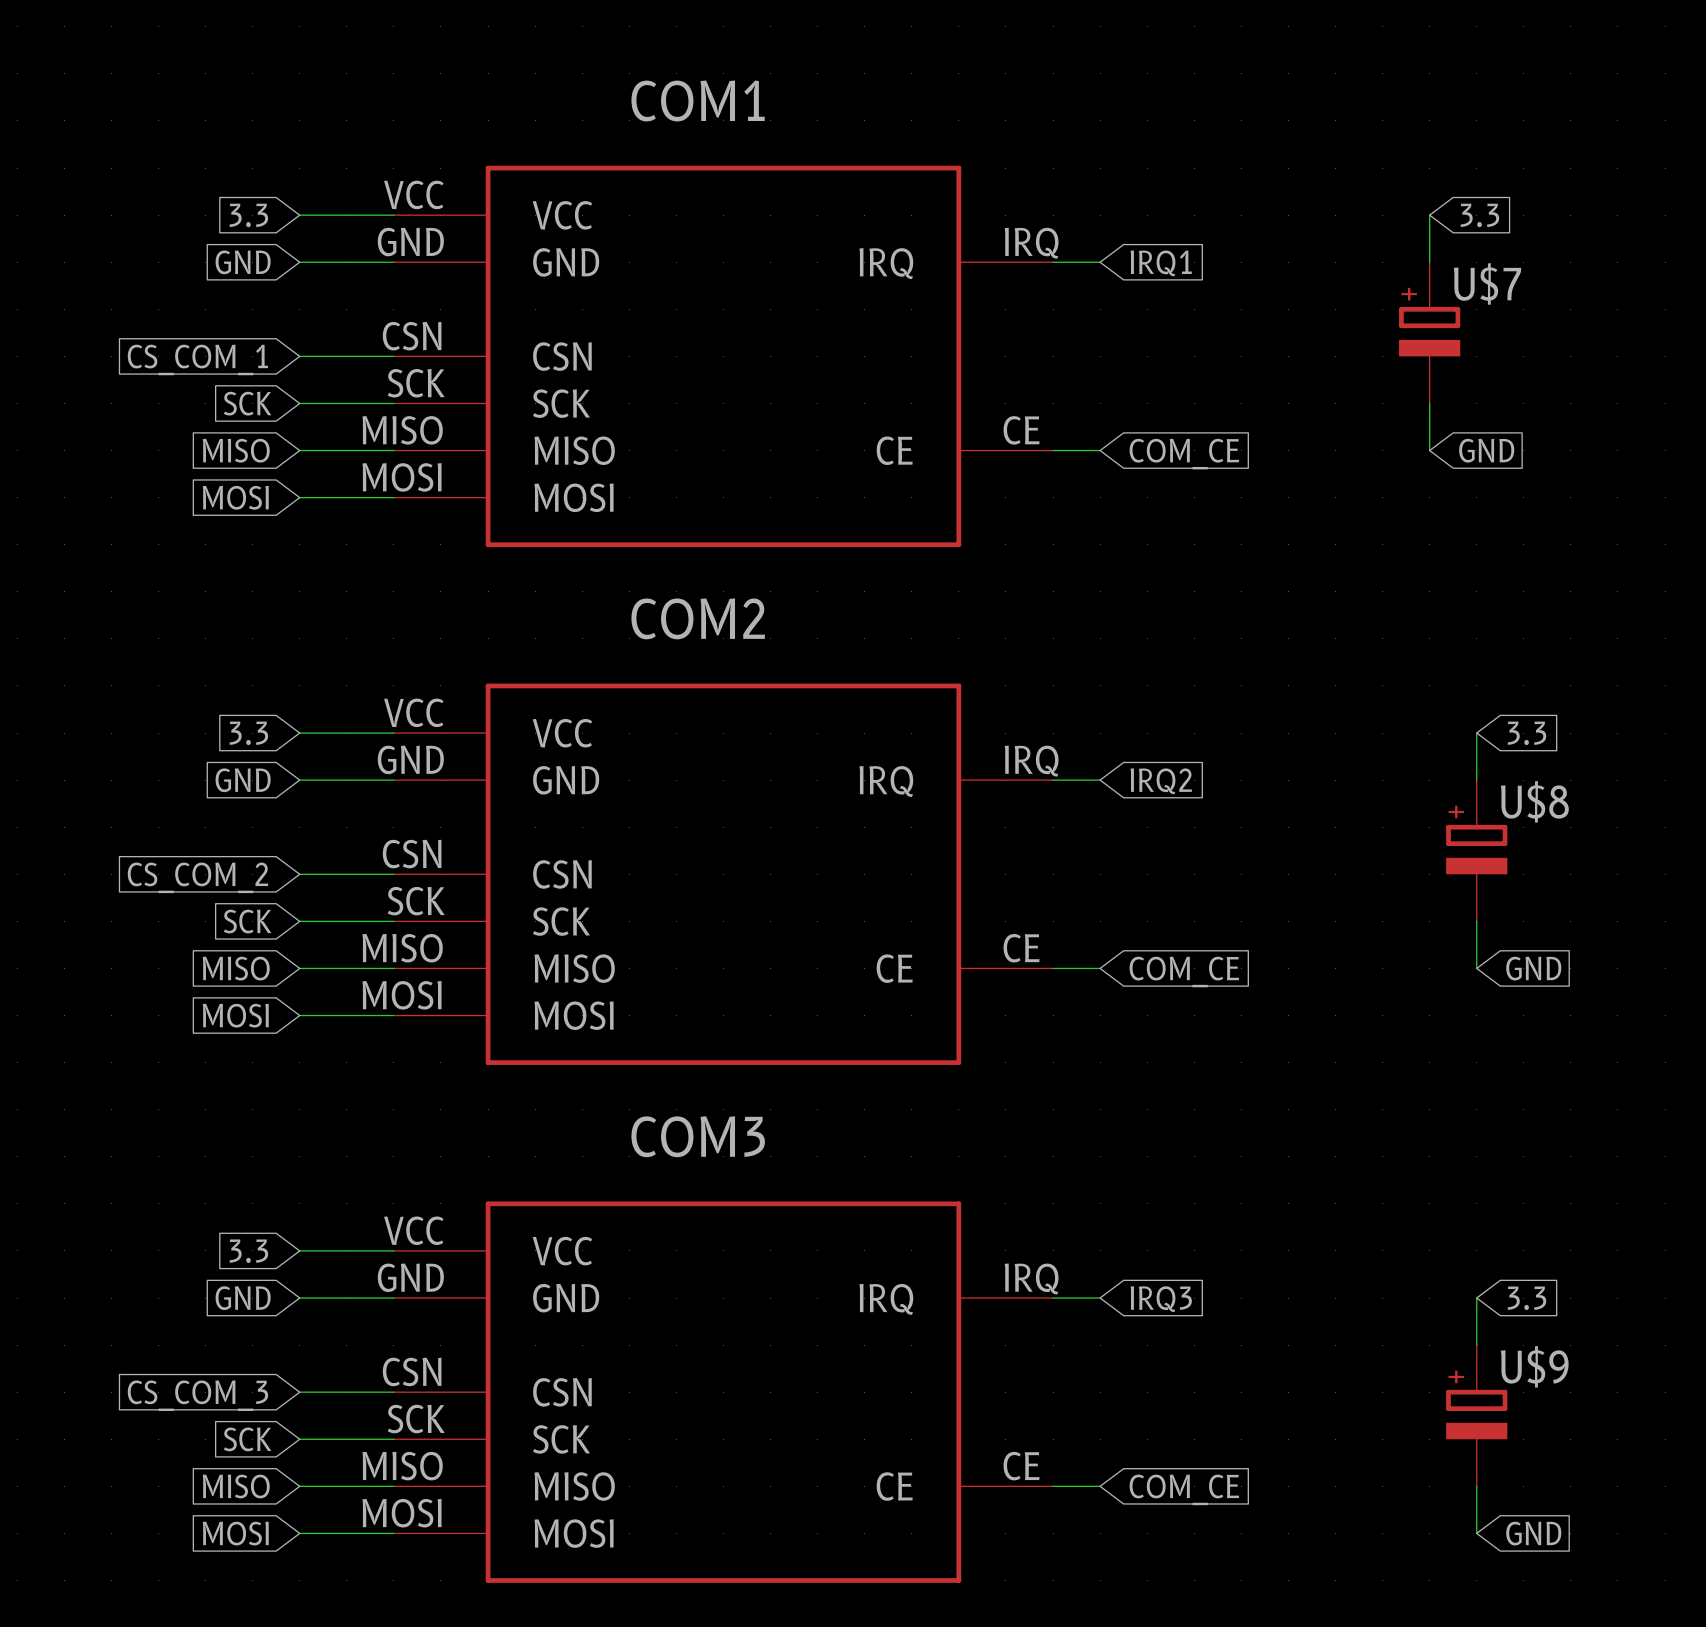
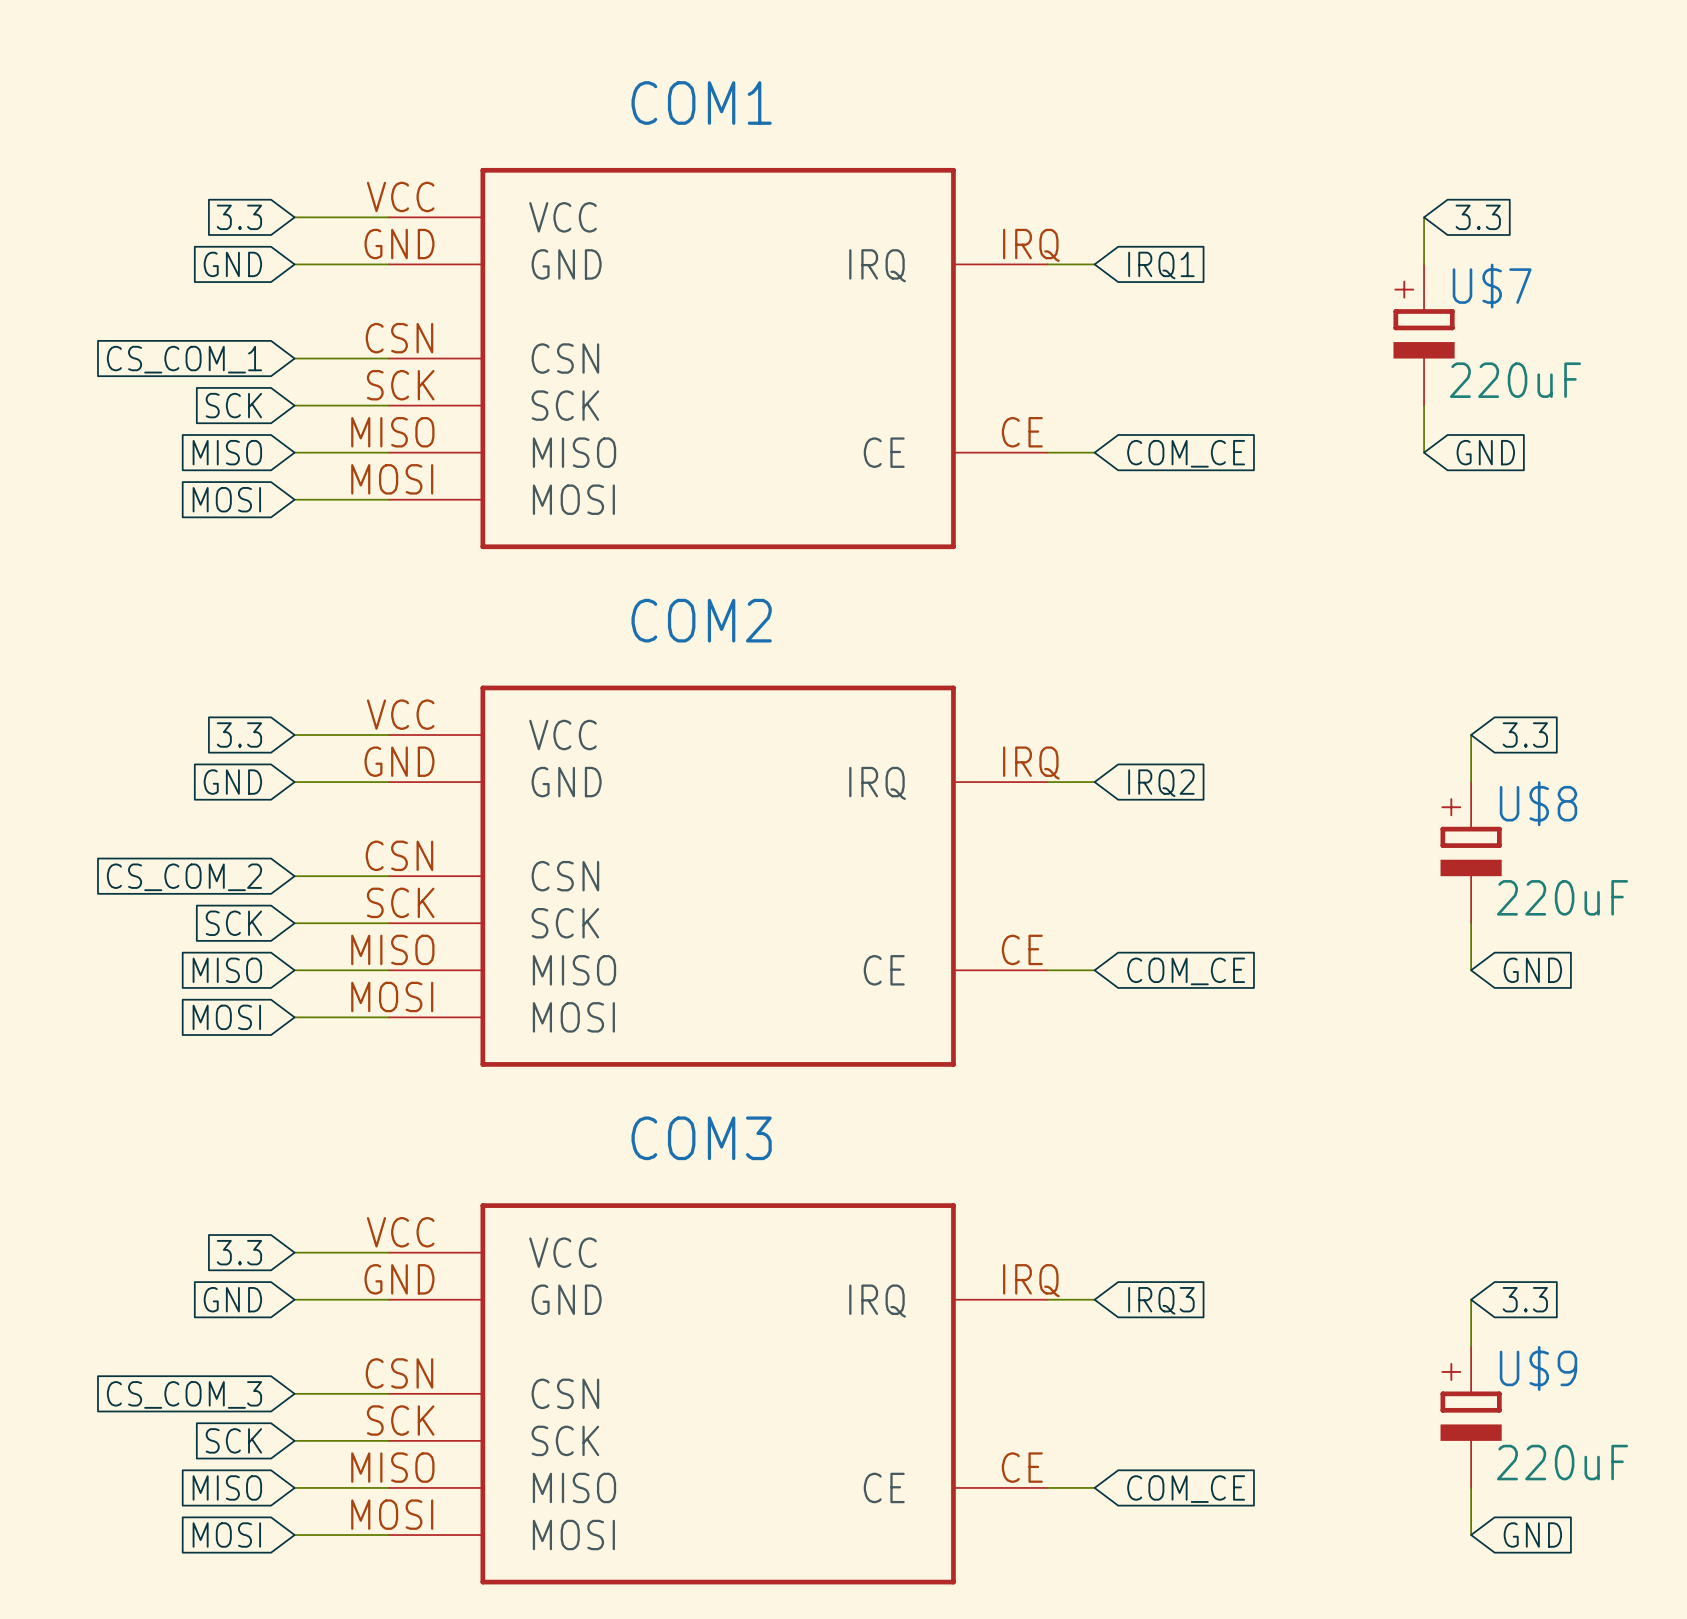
U$7 value: none -> 220uF (1515, 380)
U$8 value: none -> 220uF (1562, 897)
U$9 value: none -> 220uF (1562, 1462)

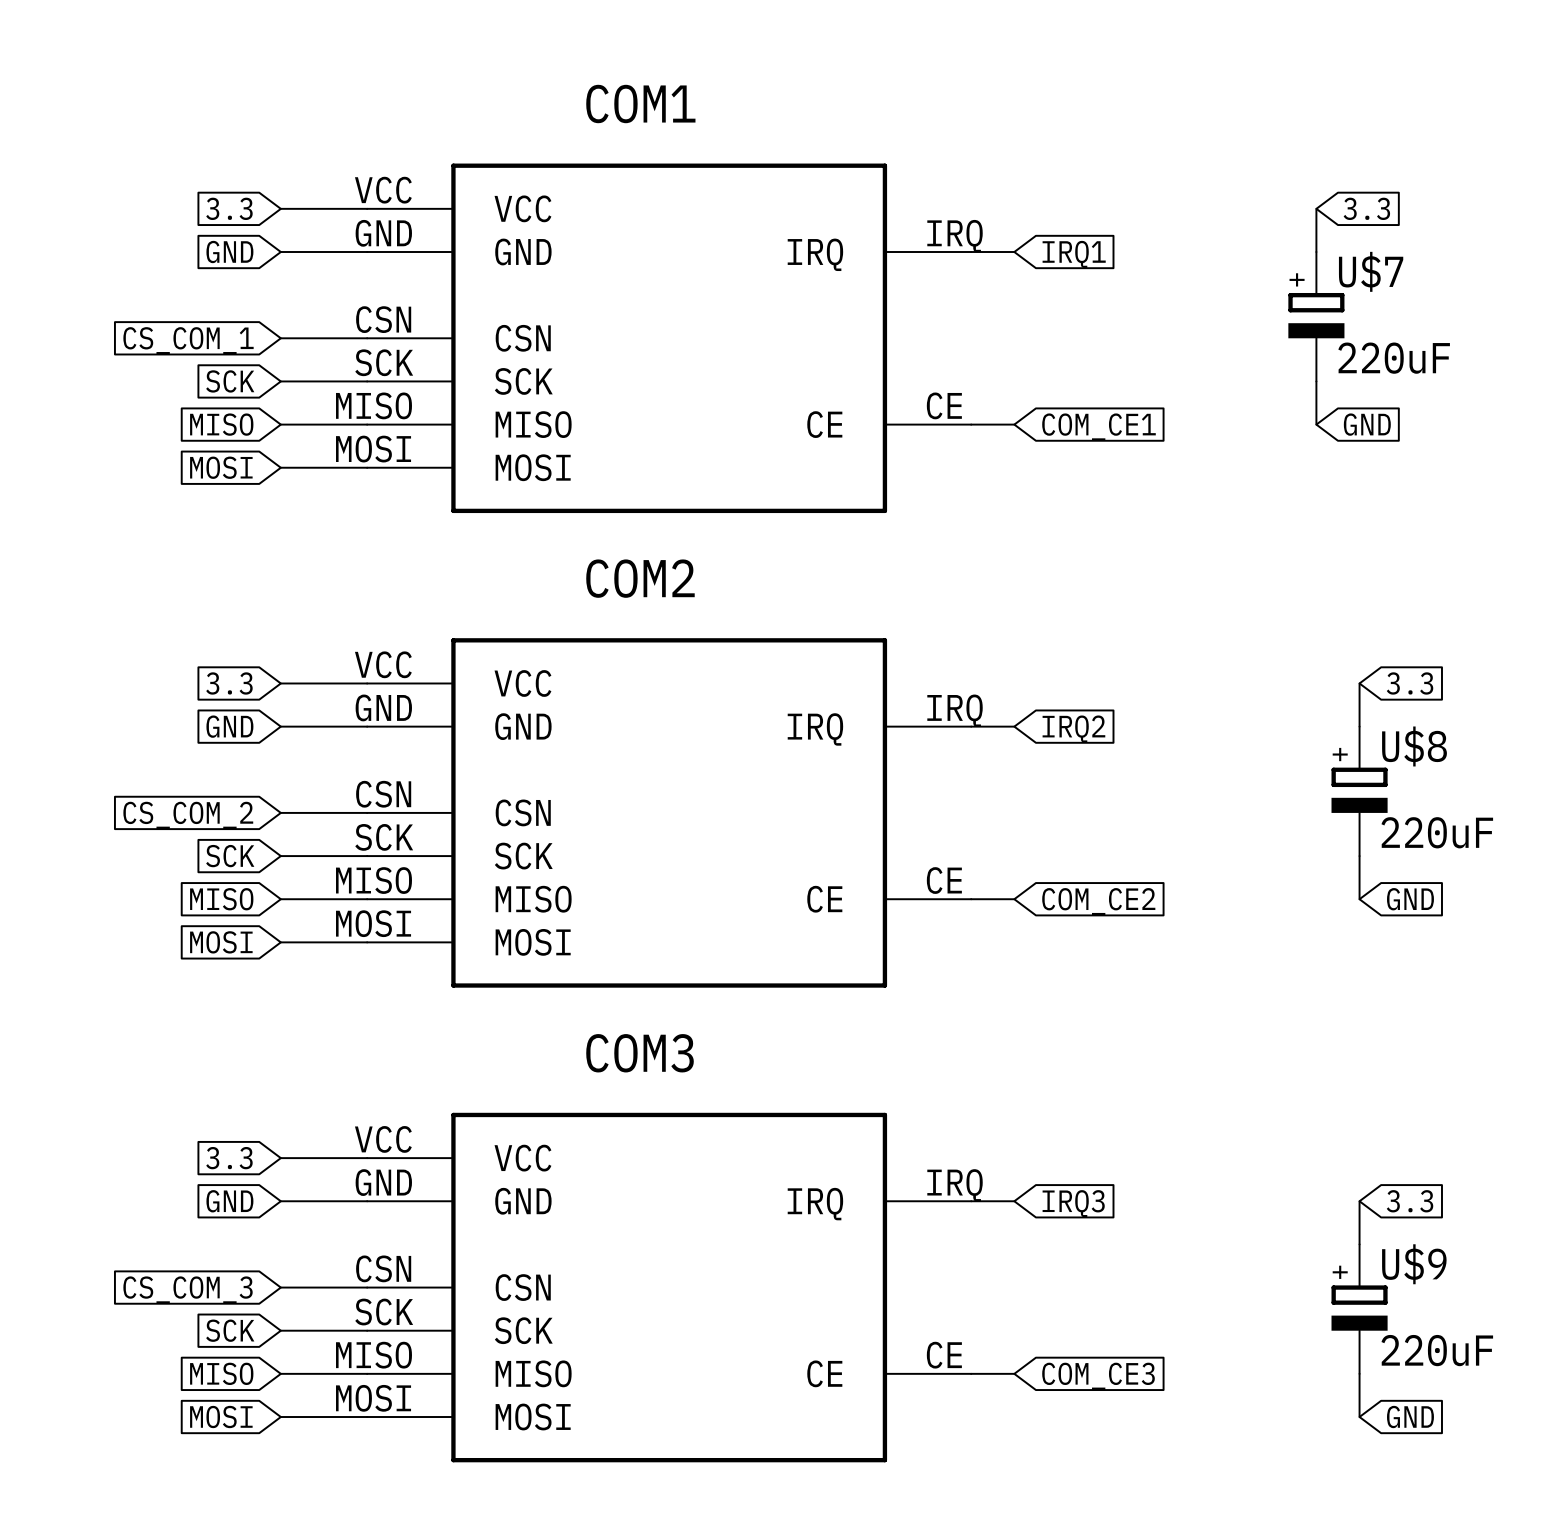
global label: COM_CE (1186, 453) -> COM_CE1 (1098, 427)
global label: COM_CE (1186, 971) -> COM_CE2 (1098, 901)
global label: COM_CE (1186, 1489) -> COM_CE3 (1098, 1376)

